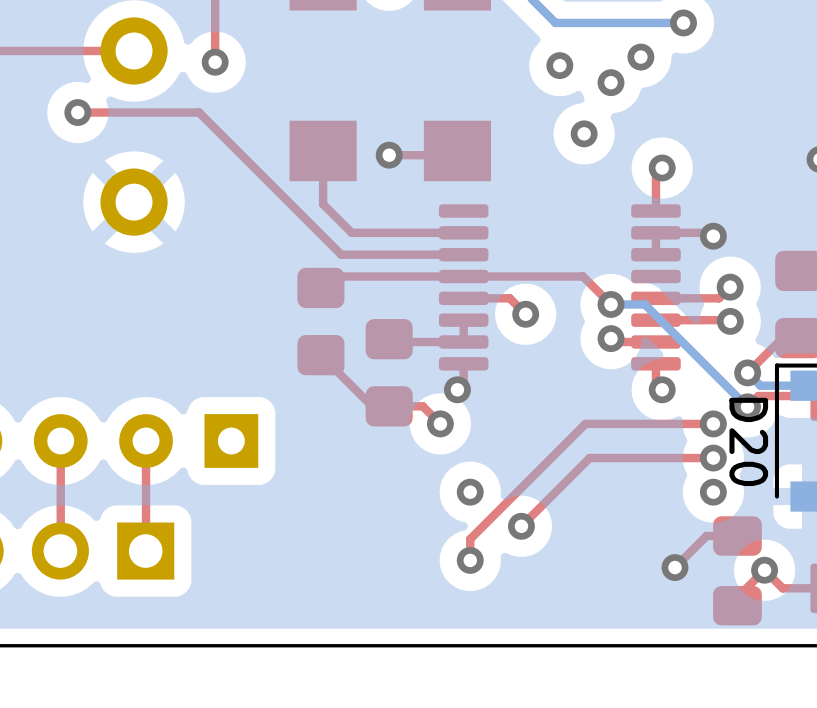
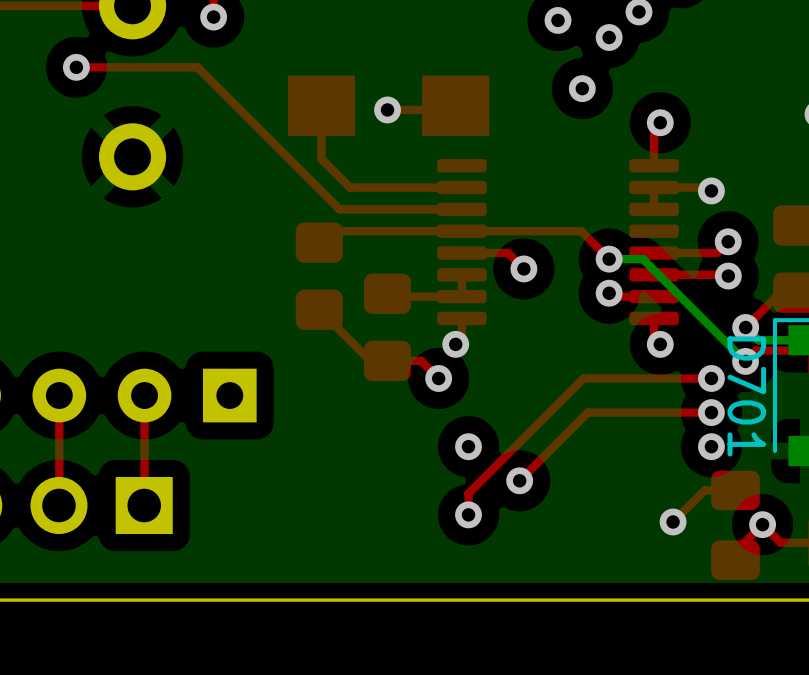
D20 name: D20 (748, 441) -> D701 (746, 396)

